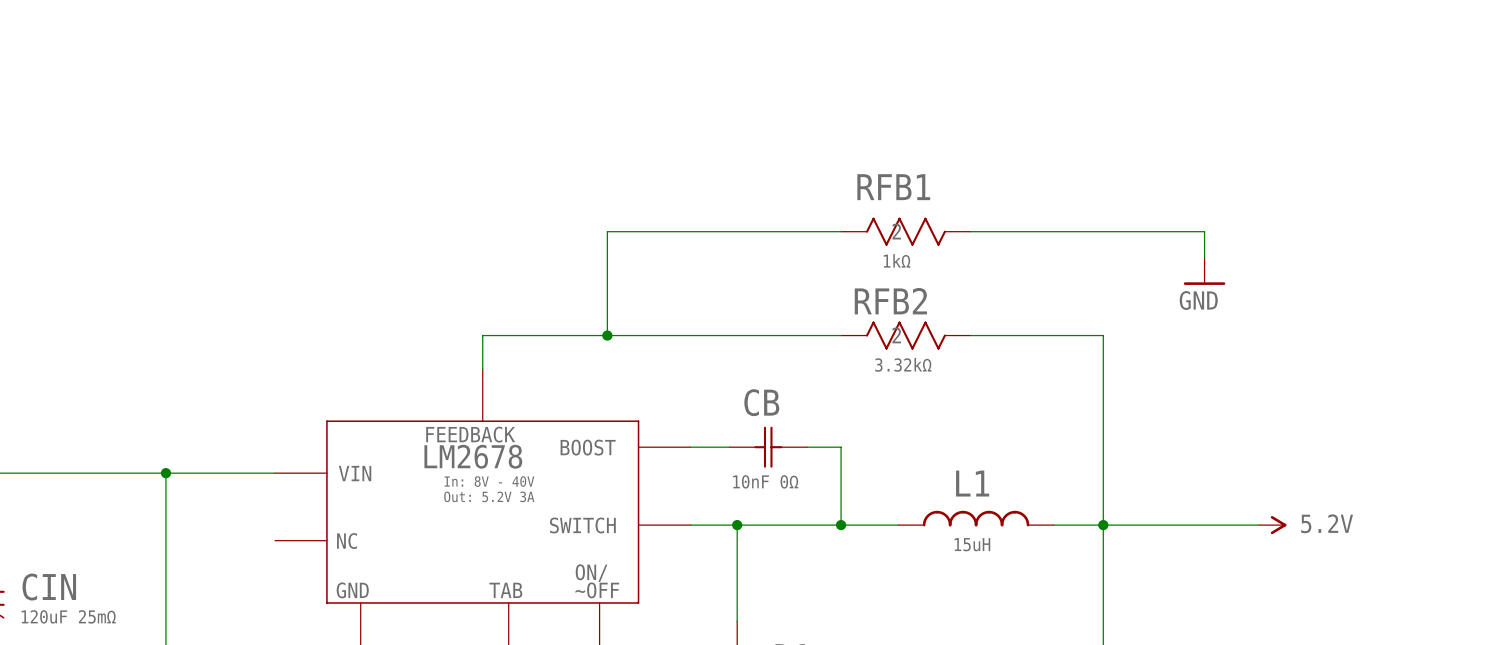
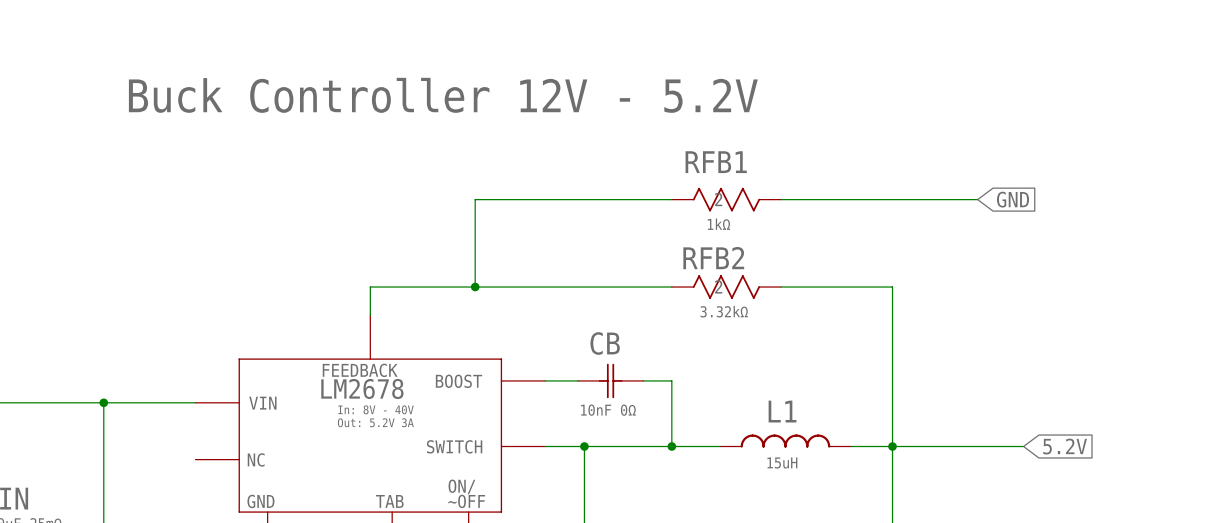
text: none -> Buck Controller 12V - 5.2V (443, 95)
wire: (1204, 231) (1204, 257) -> none
global label: none -> GND (1013, 199)
power symbol: GND (1204, 271) -> none
power symbol: 5.2V (1272, 525) -> none
global label: none -> 5.2V (1065, 446)

